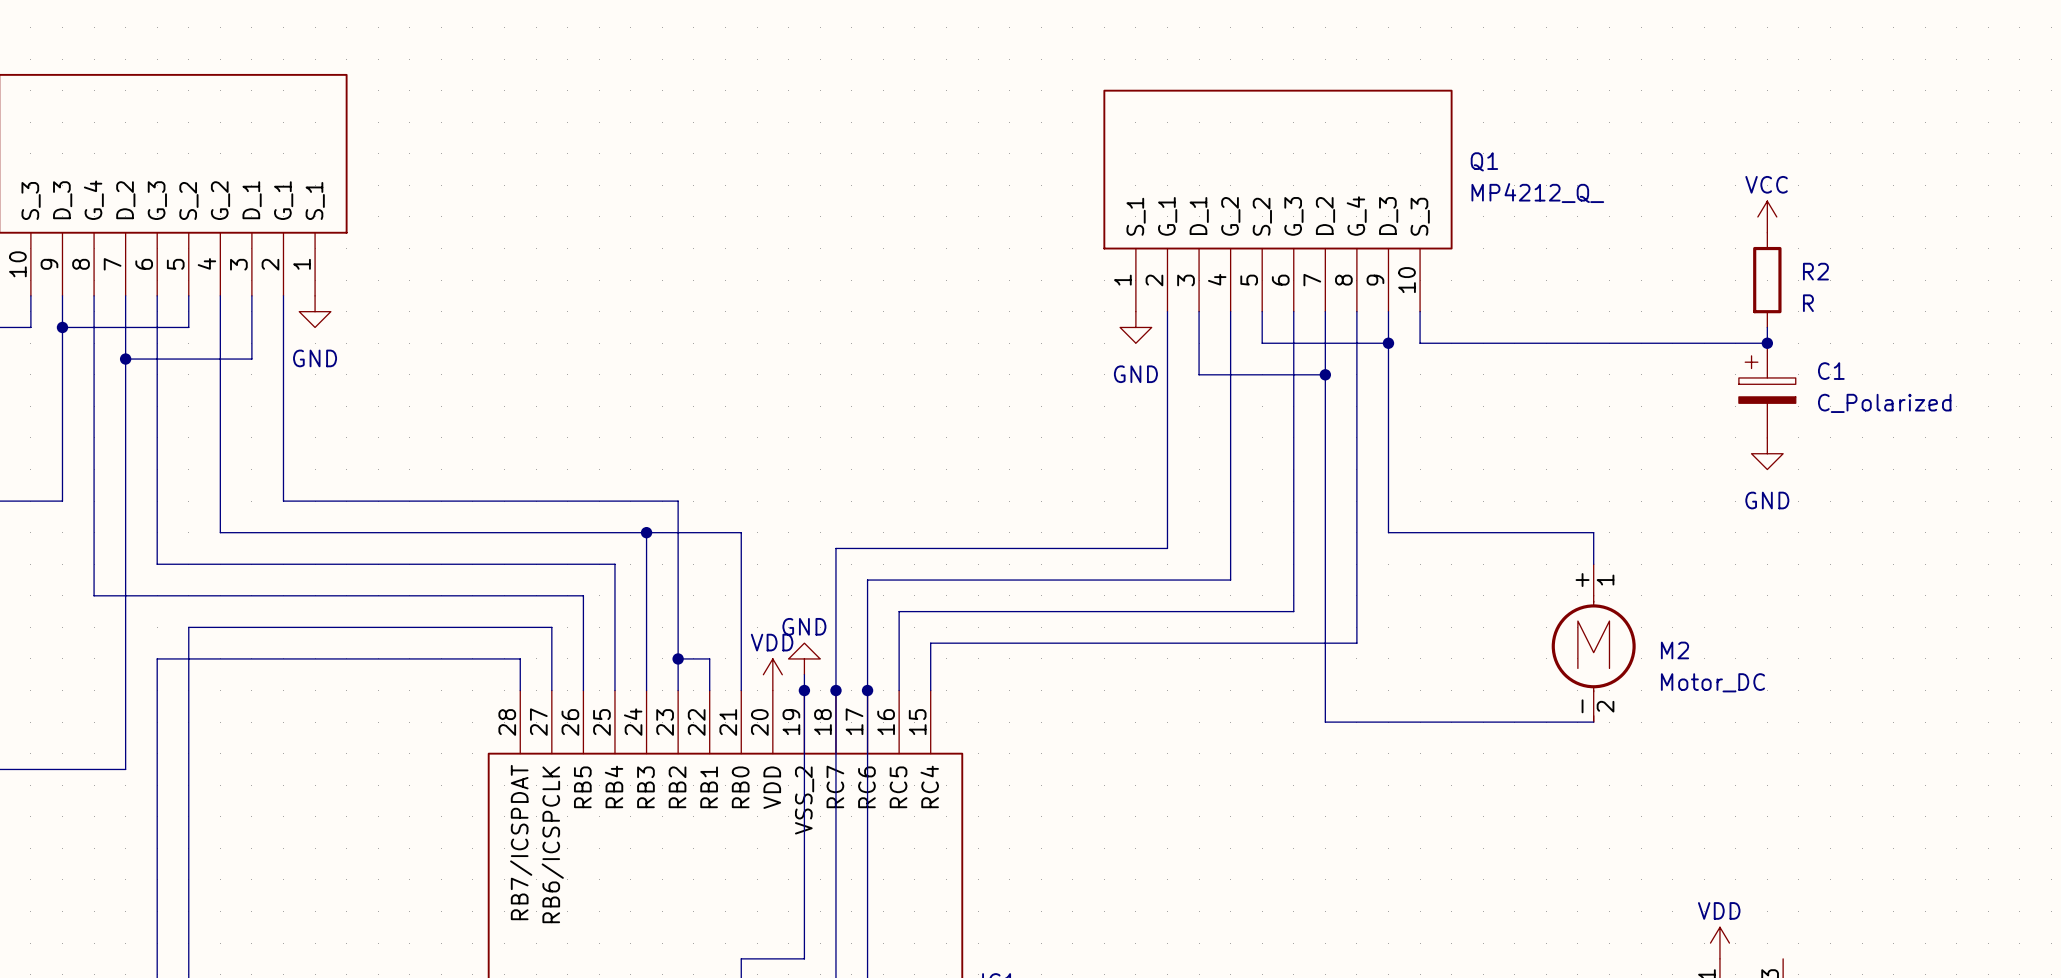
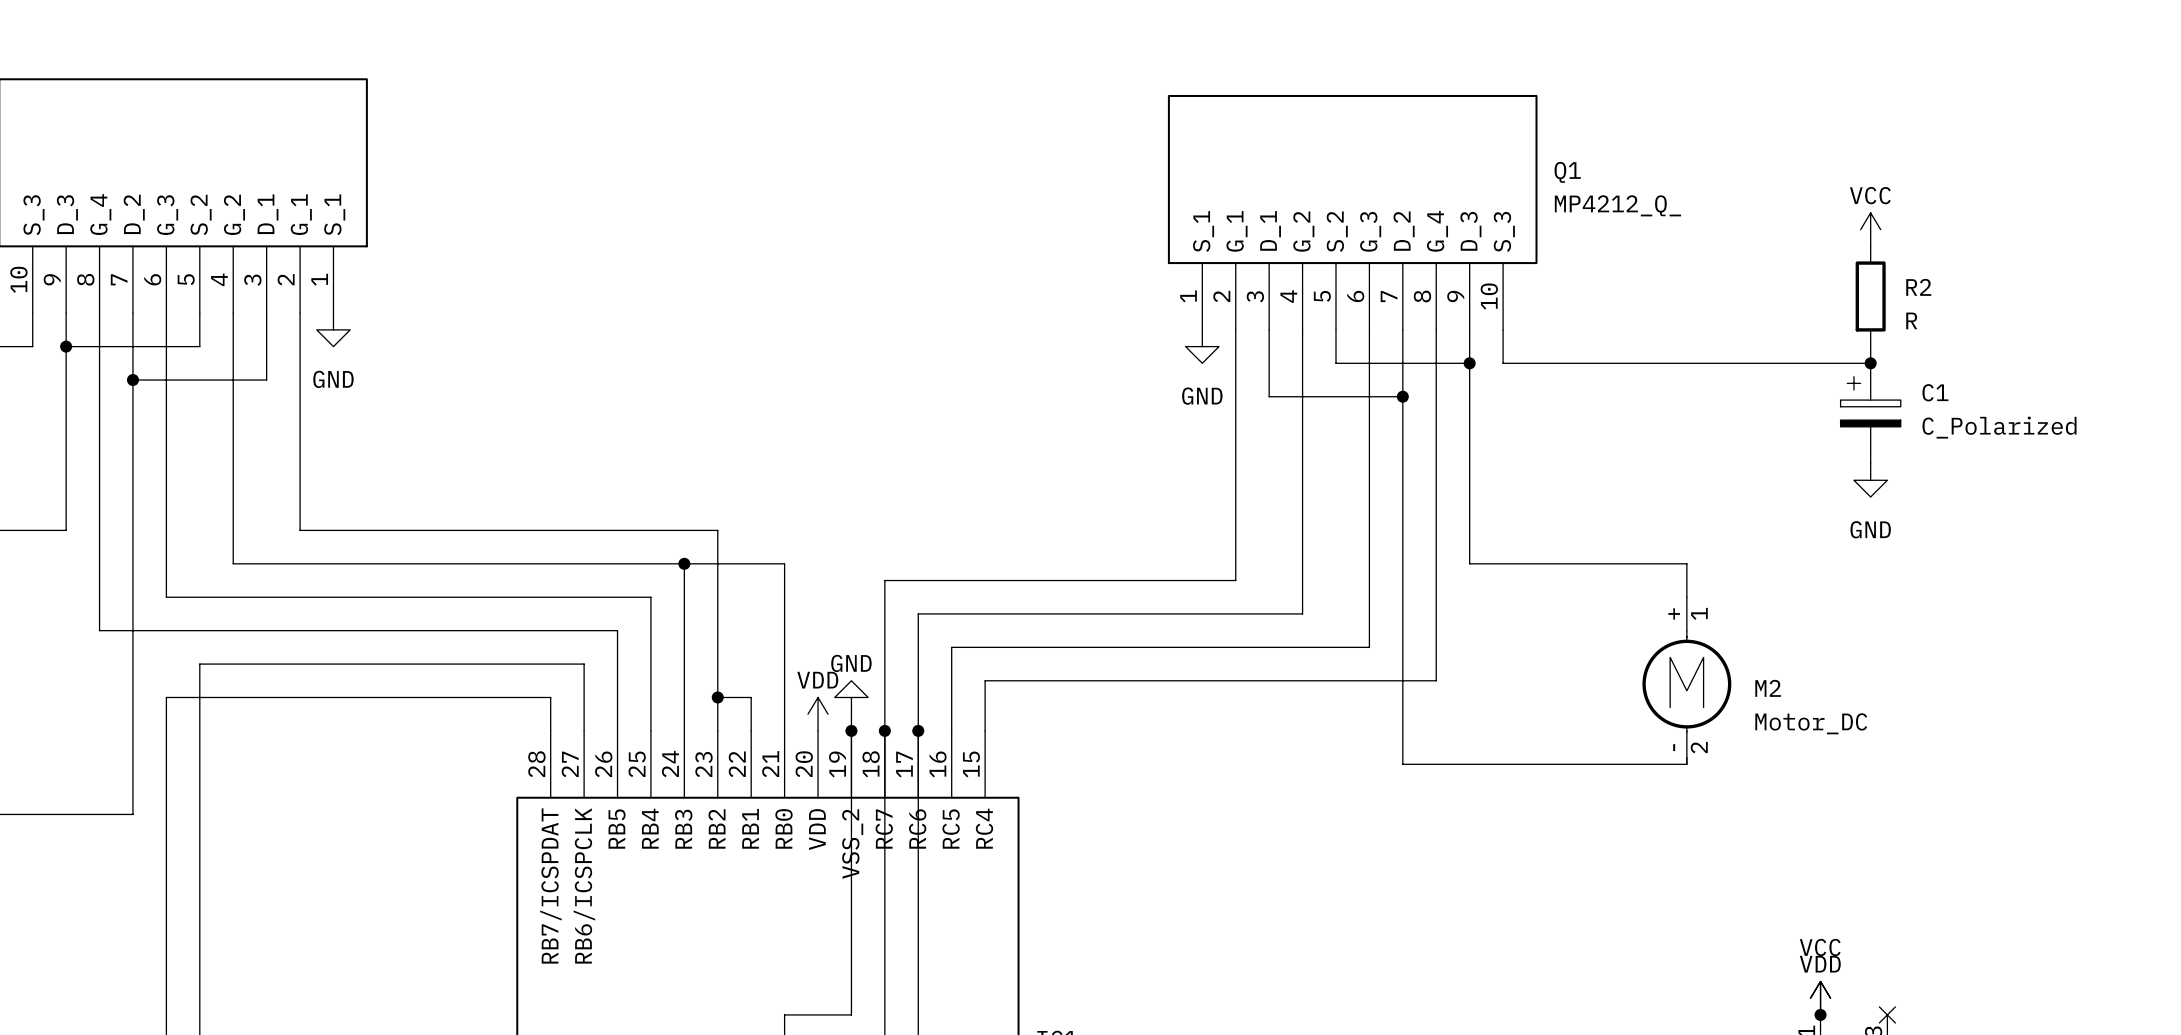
power symbol: none -> VCC (1820, 998)
junction: none -> (1820, 1014)
no-connect mark: none -> (1887, 1014)

